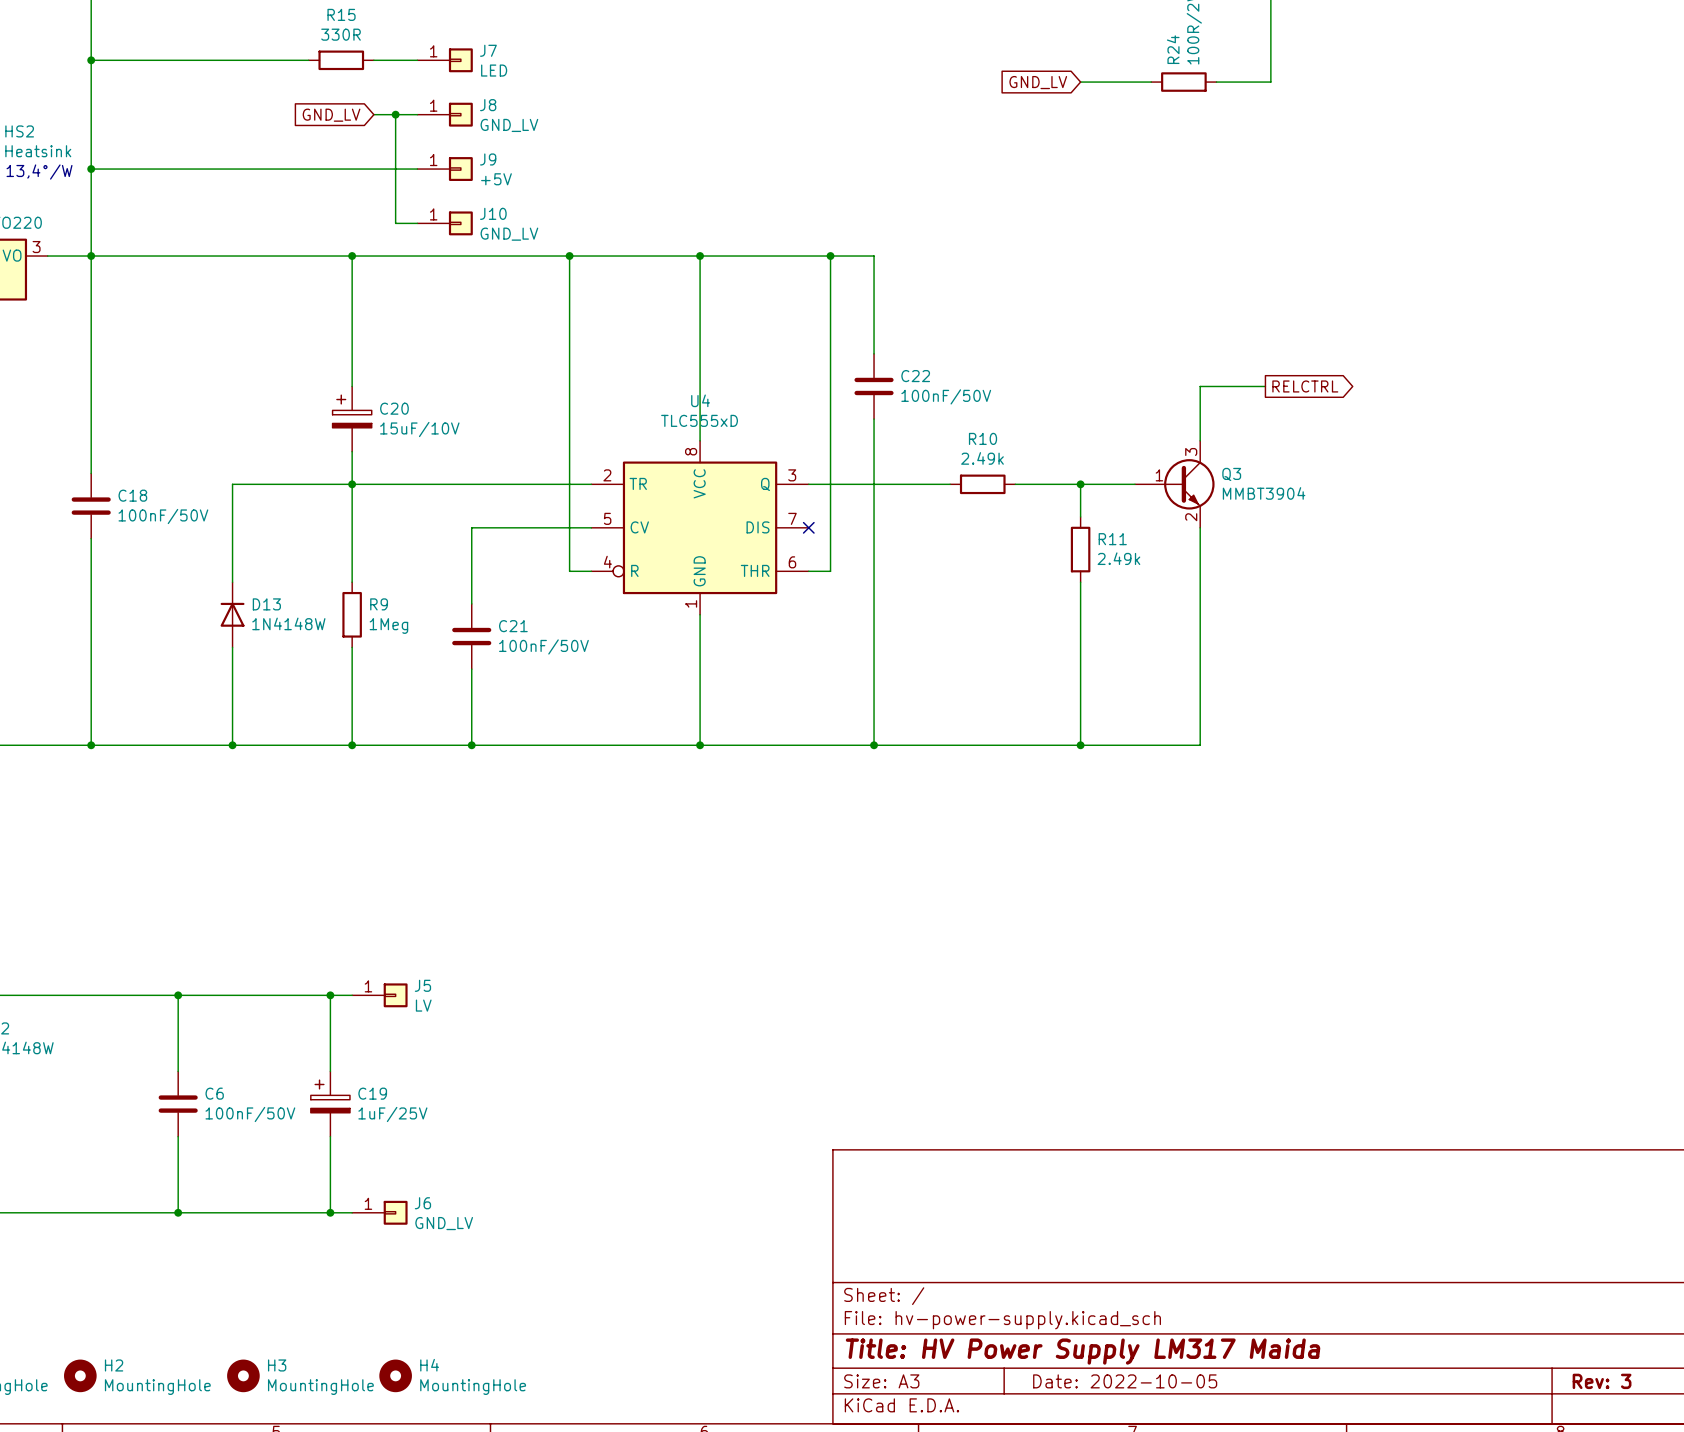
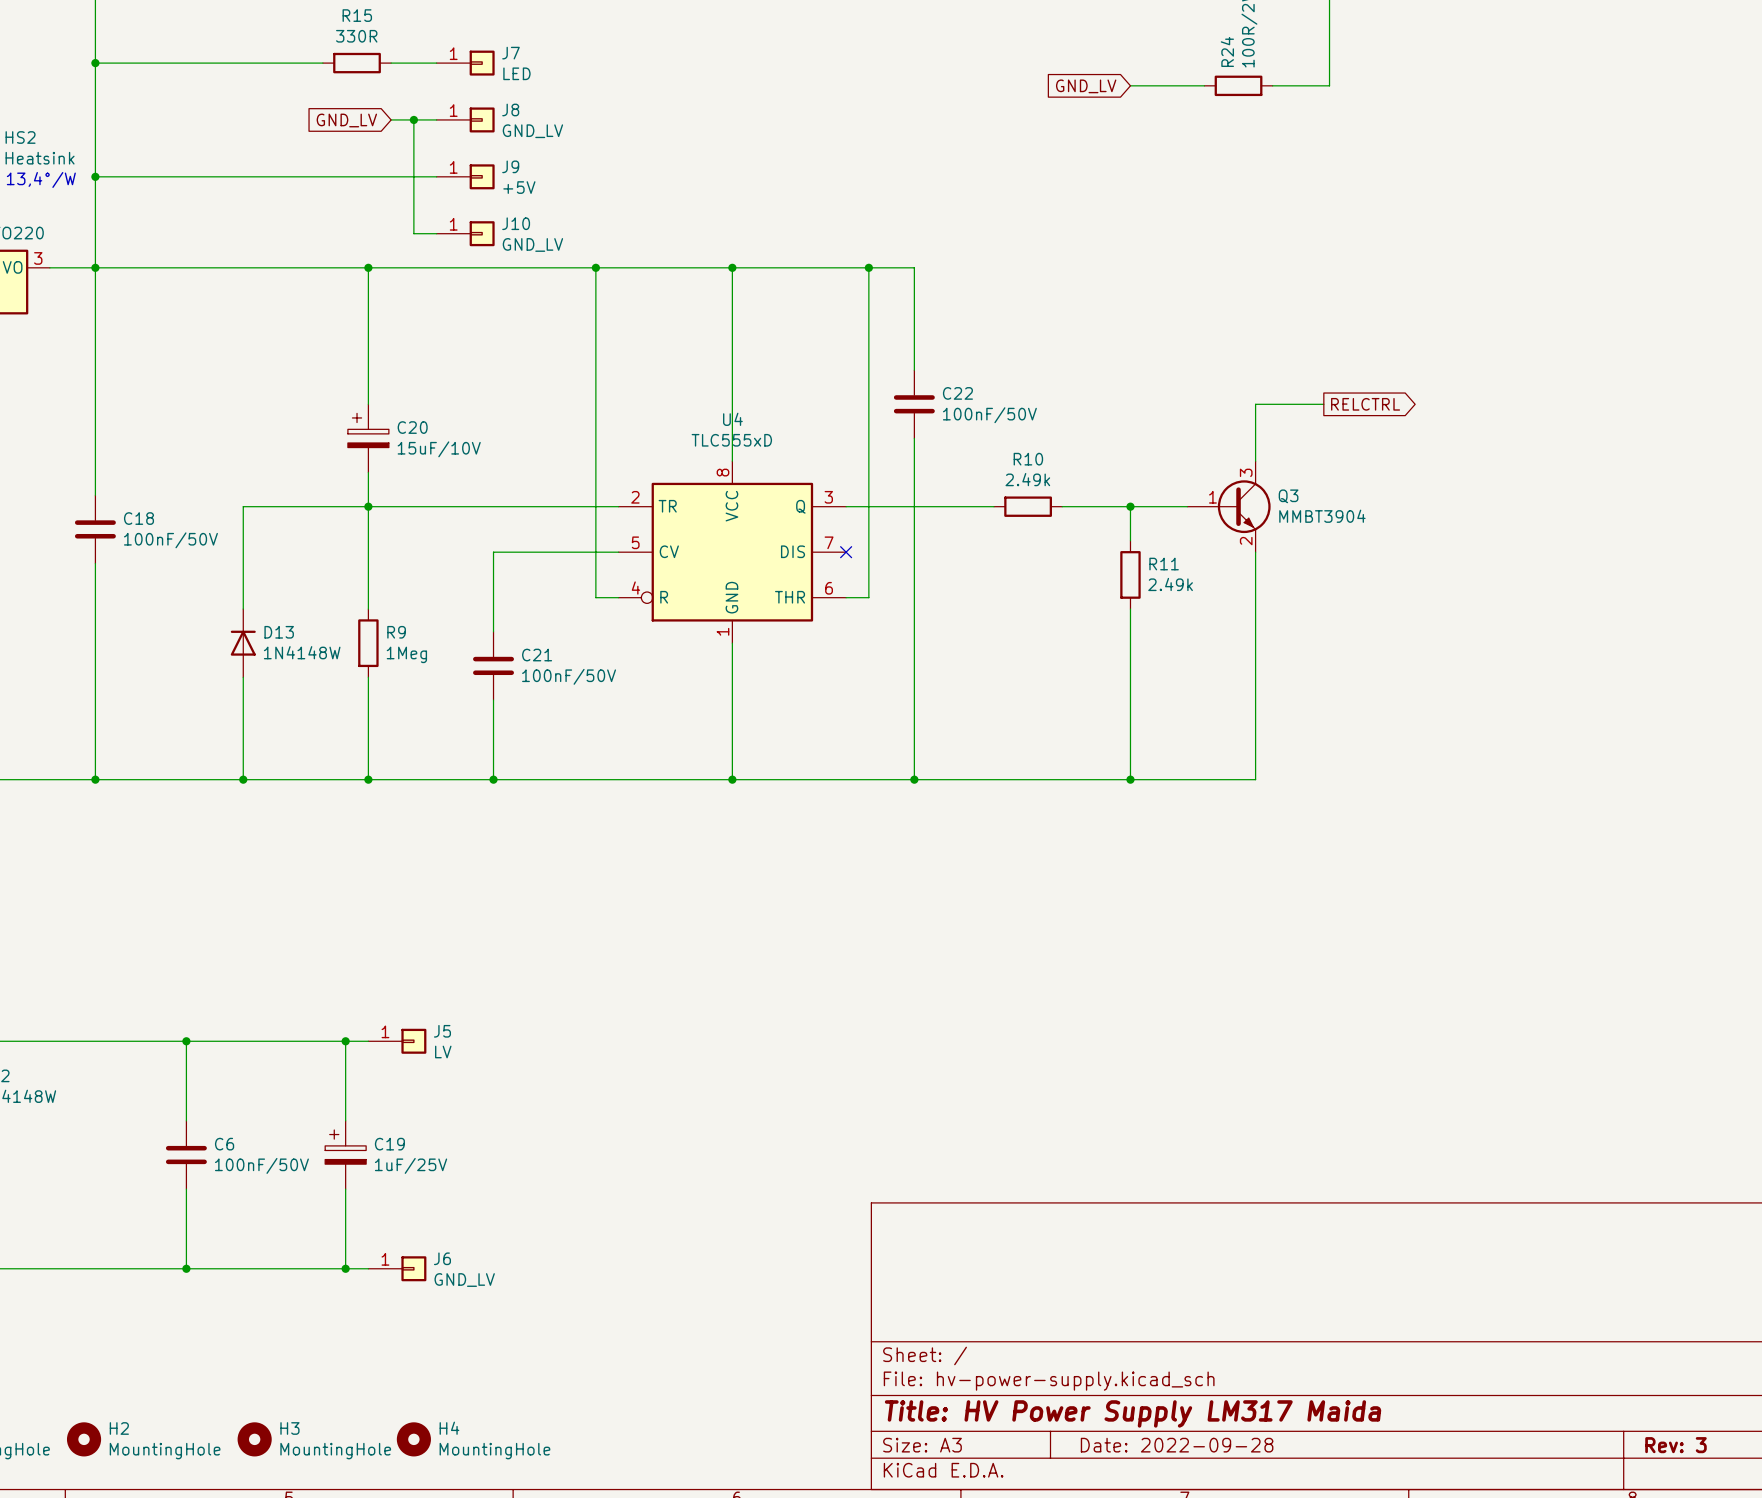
title block: Date: 2022-10-05 (1125, 1381) -> Date: 2022-09-28 (1177, 1445)

